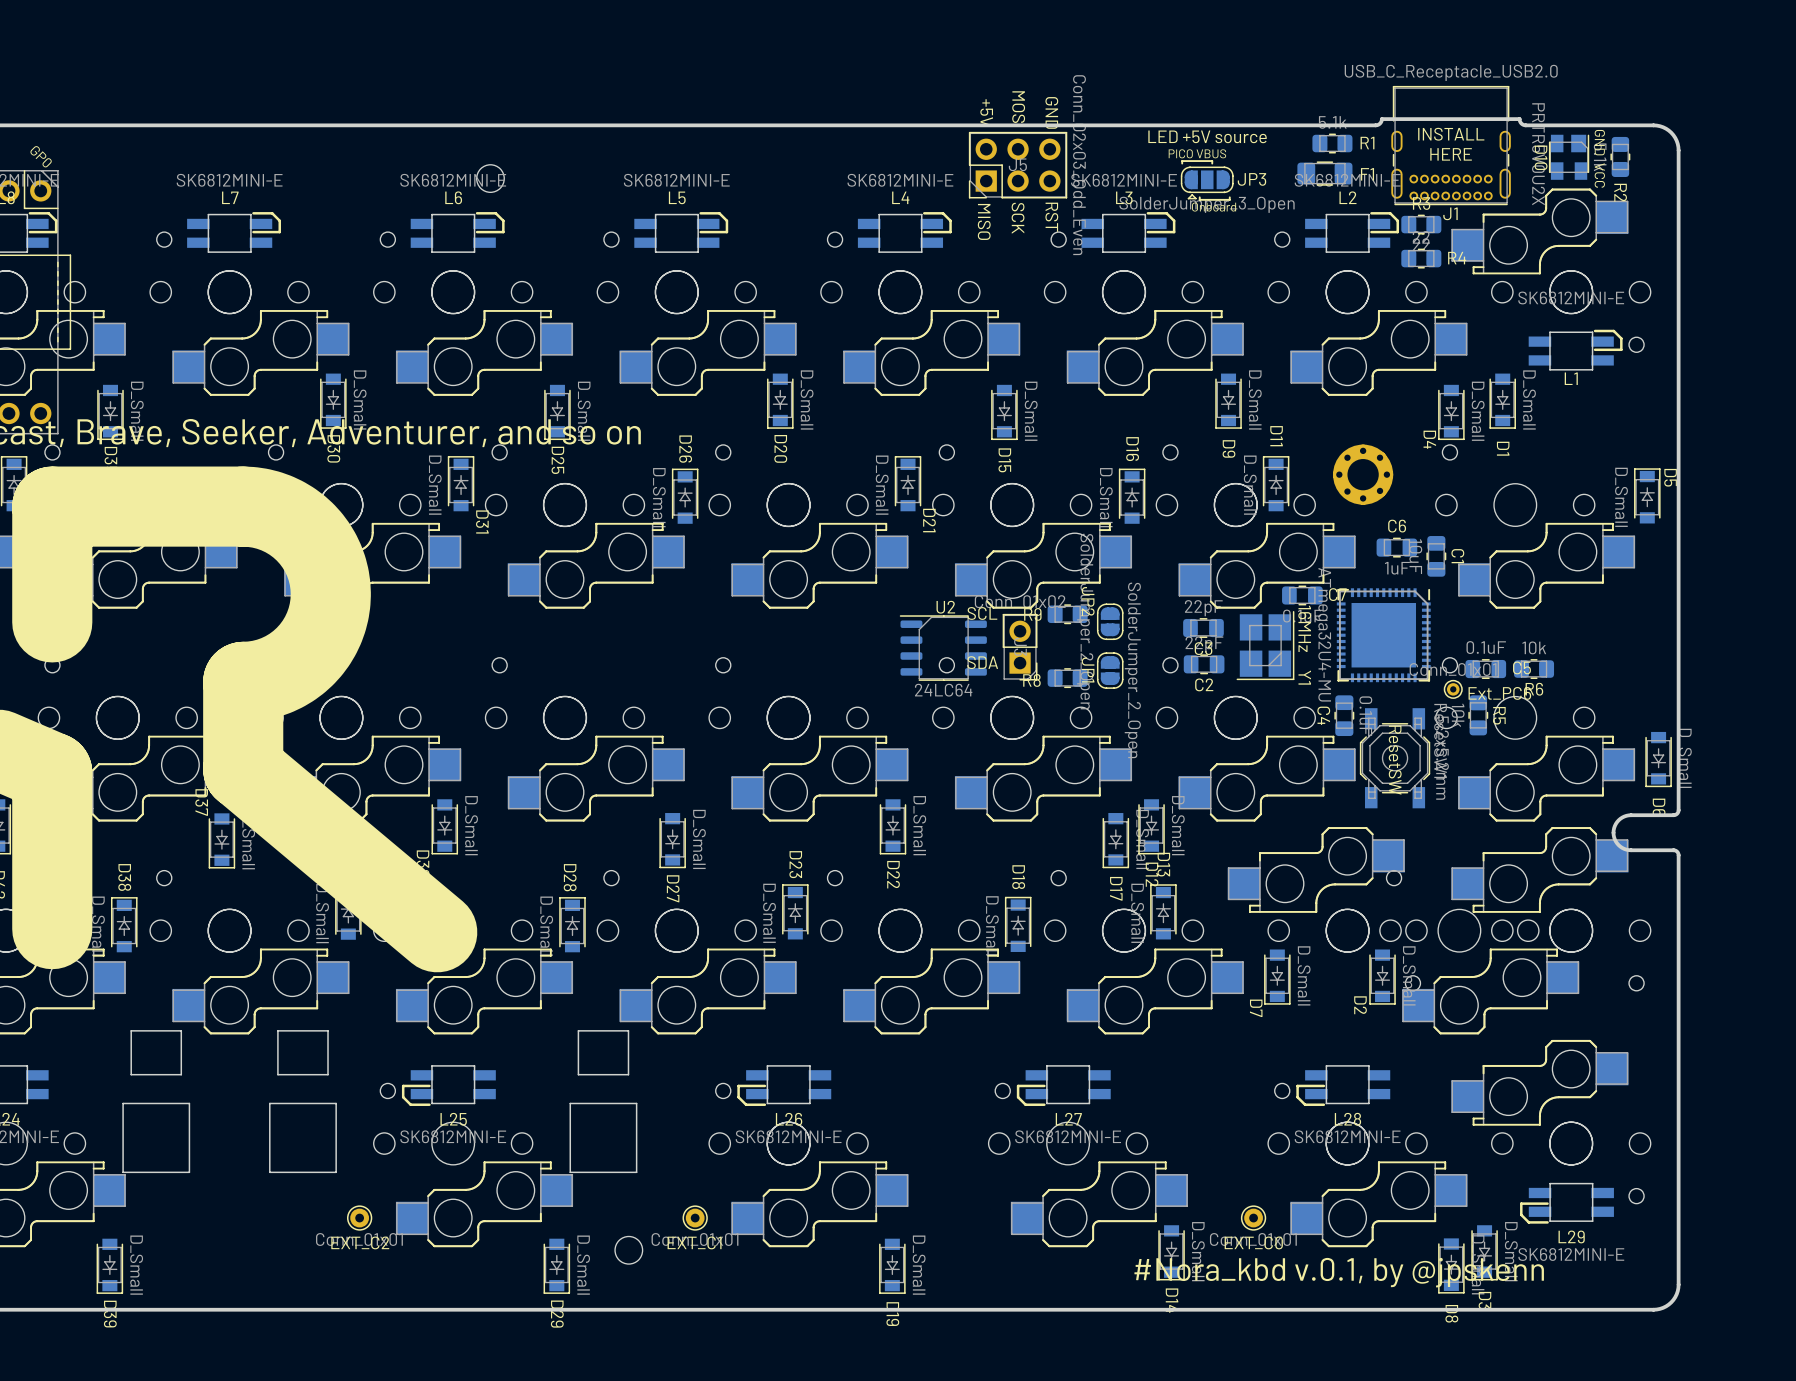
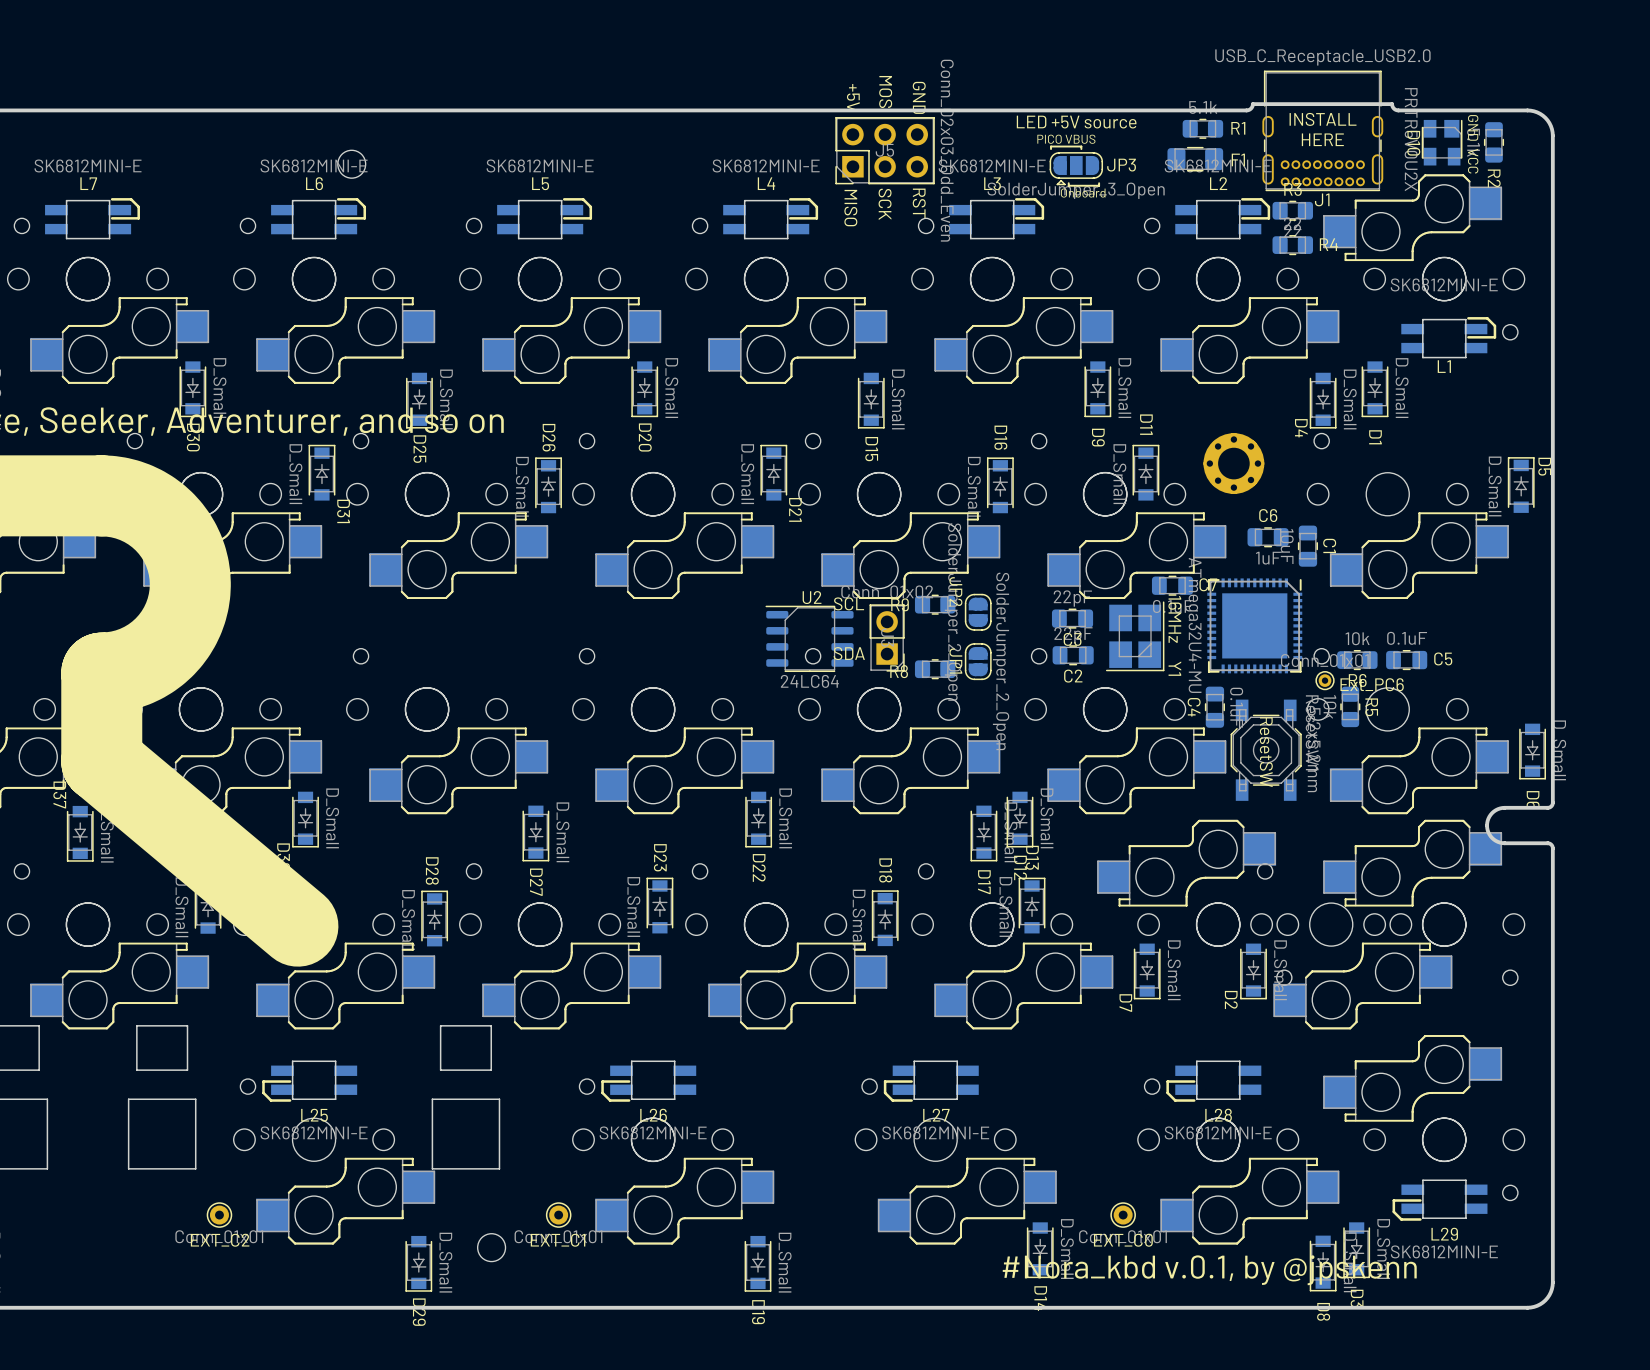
C5 position: (1485, 669) -> (1406, 660)
R6 position: (1534, 669) -> (1357, 660)

